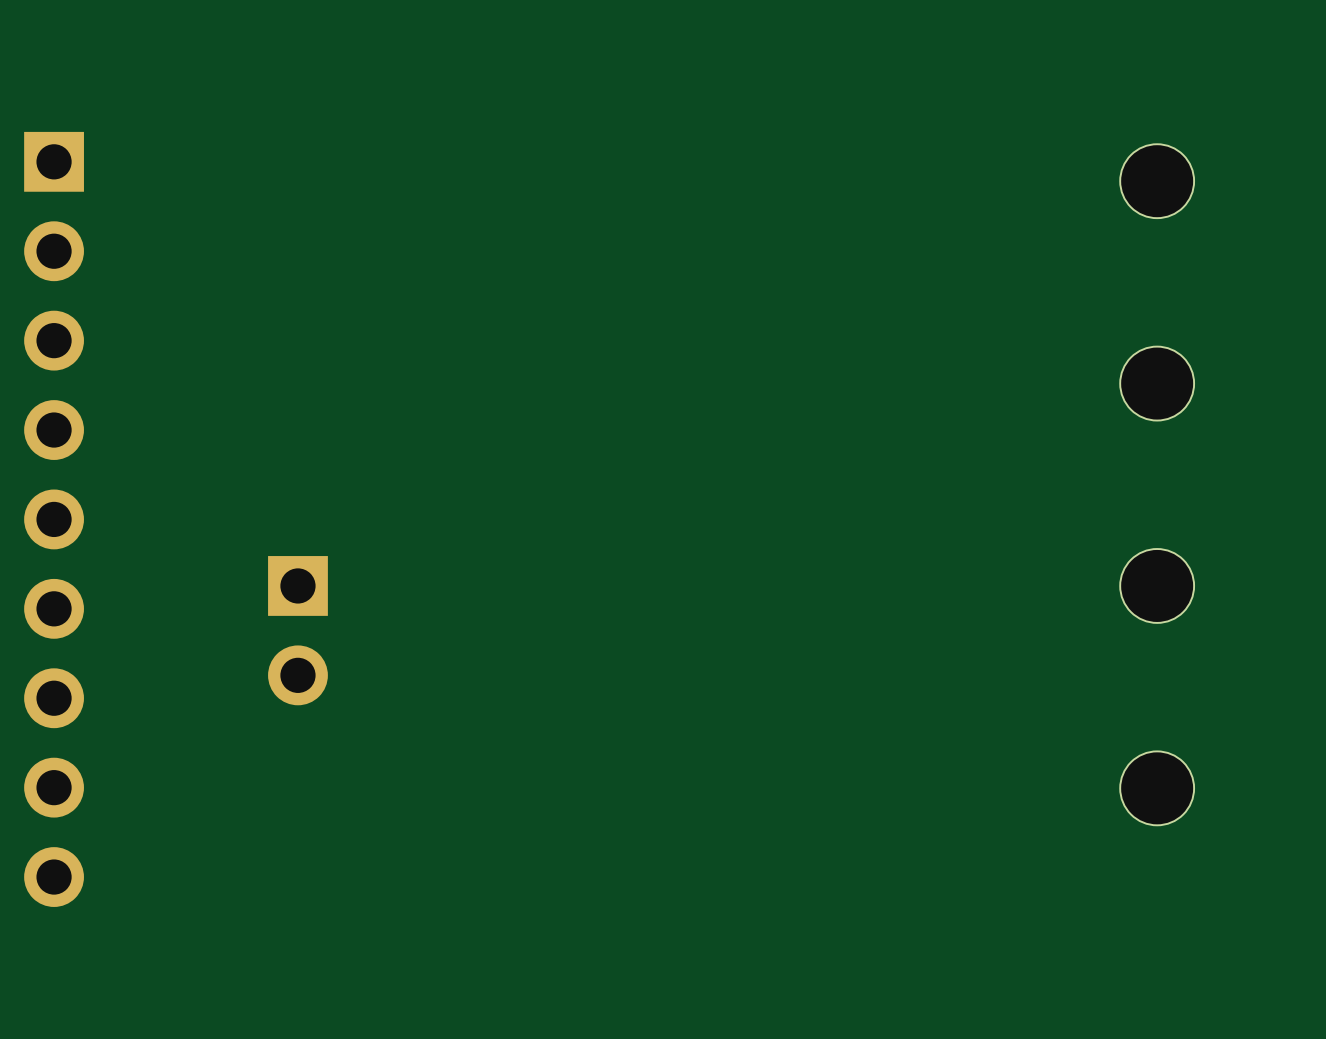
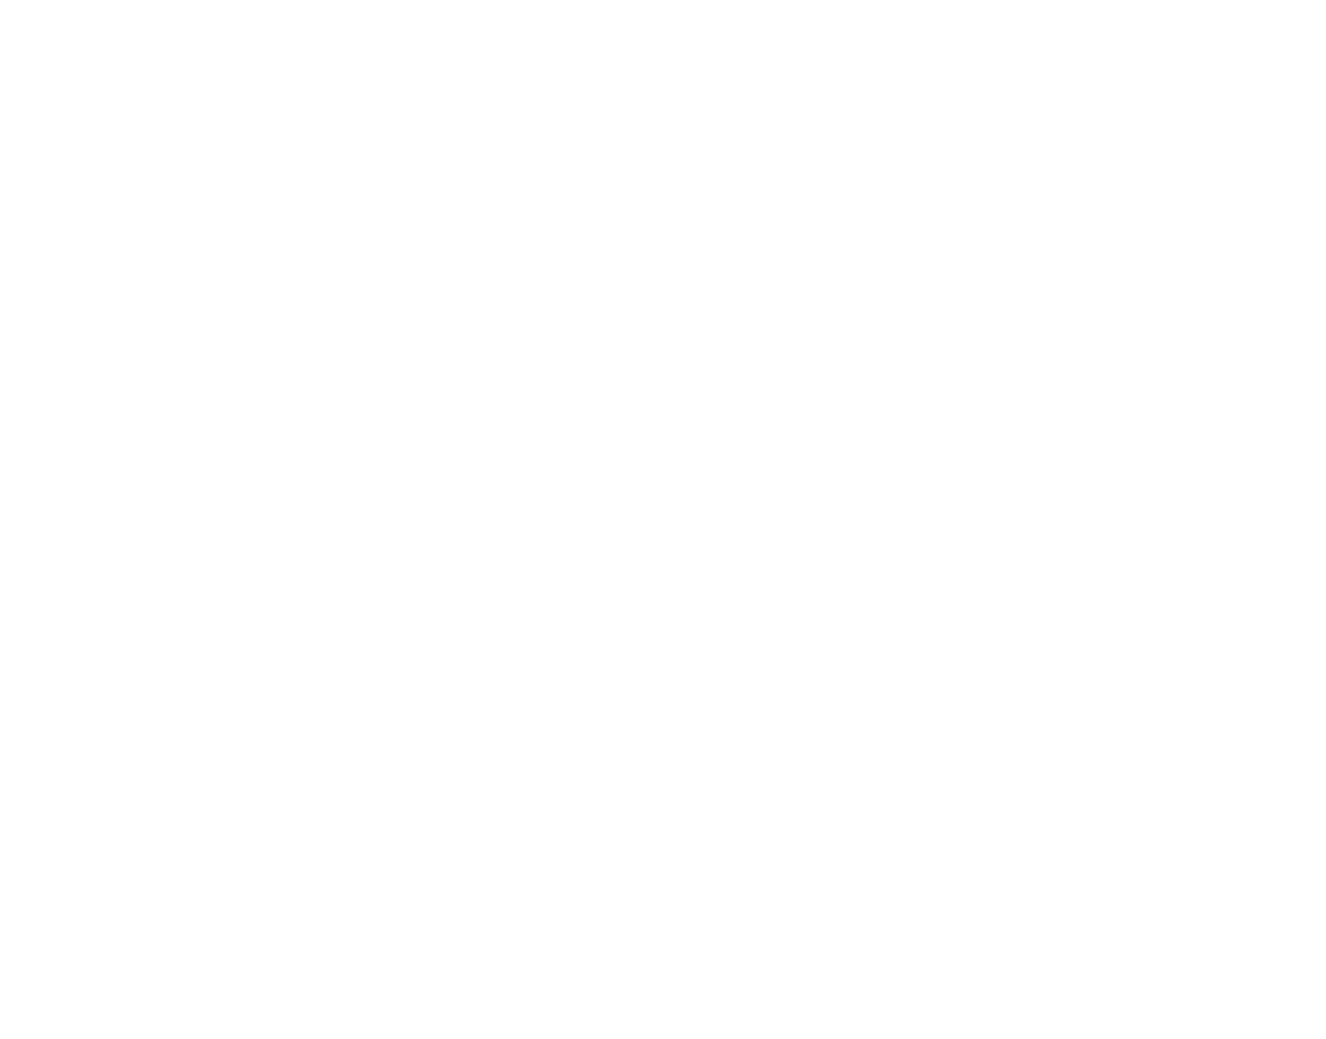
part: (1157, 181) -> none
part: (1157, 383) -> none
part: (54, 519) -> none
part: (1157, 585) -> none
part: (297, 630) -> none
part: (1157, 788) -> none

